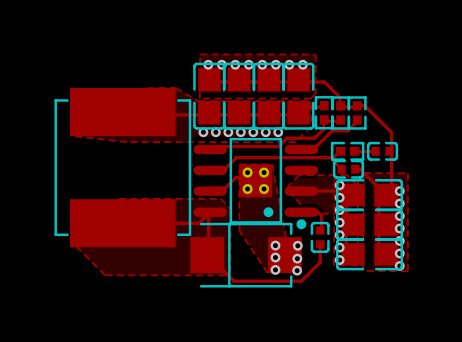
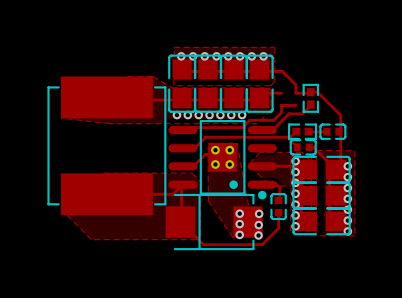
part: (324, 112) -> none
part: (340, 112) -> none

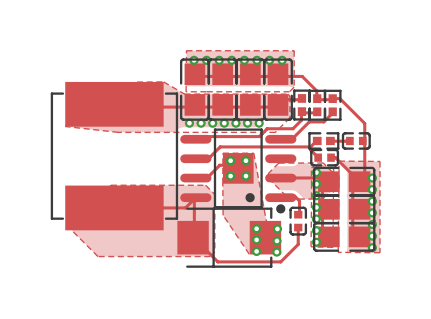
part: none -> (301, 105)
part: none -> (317, 105)

